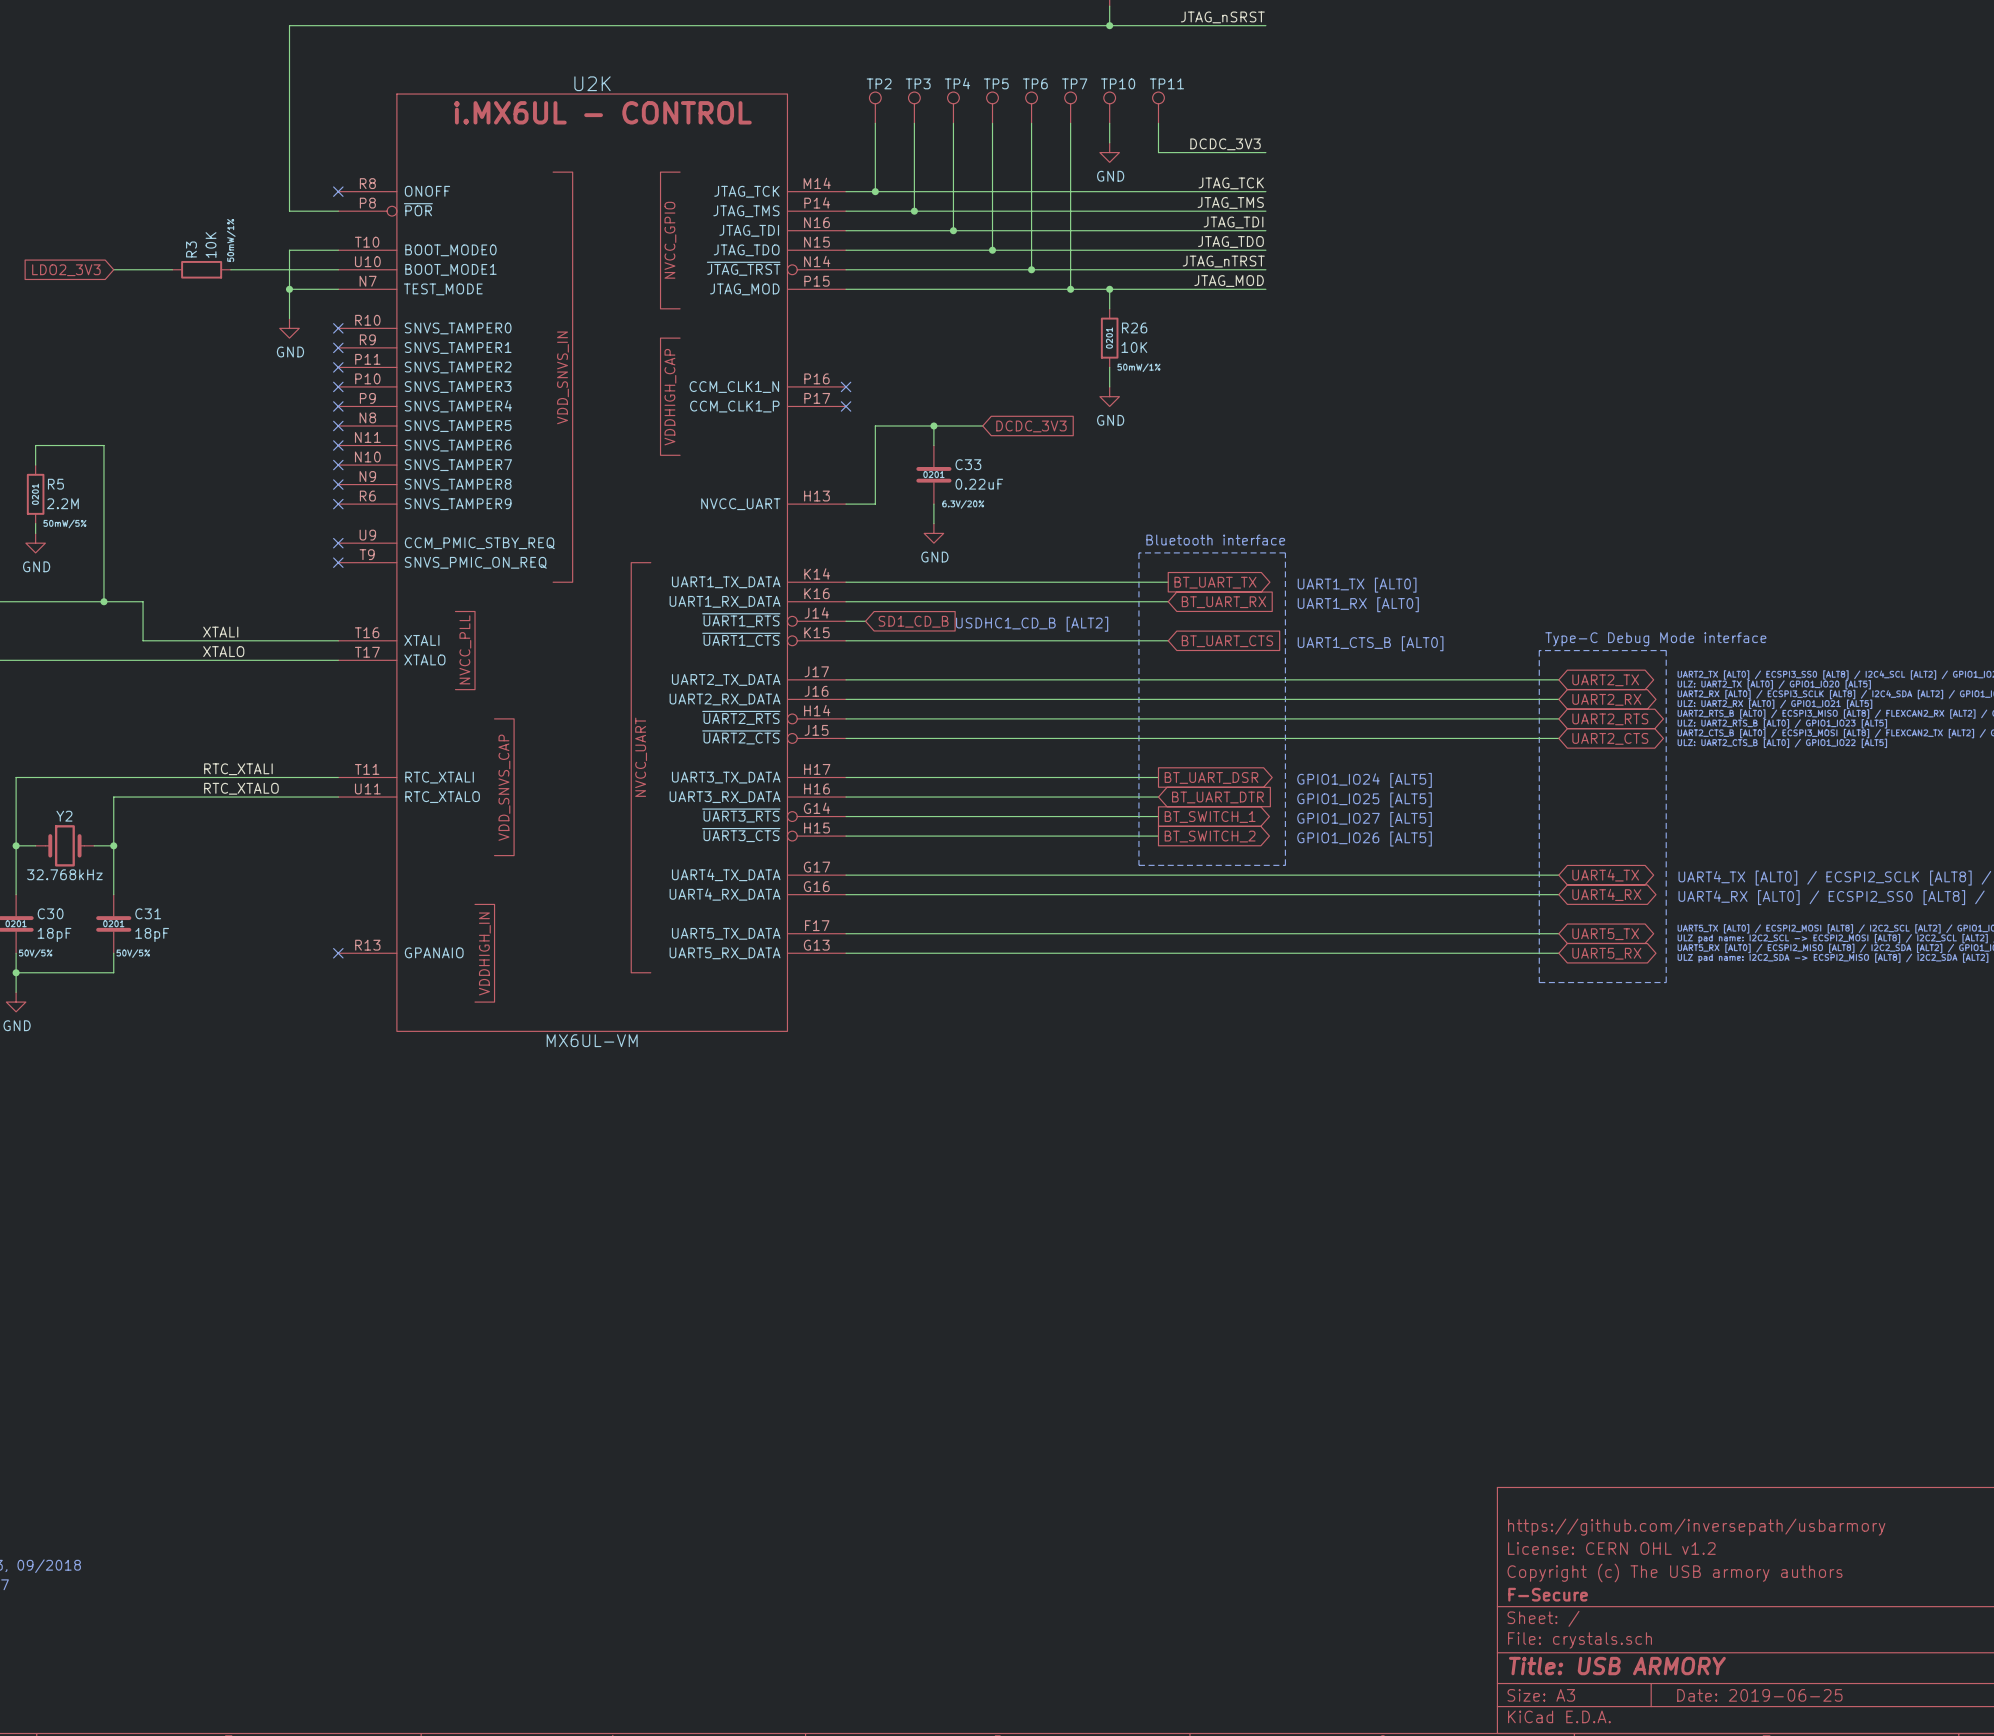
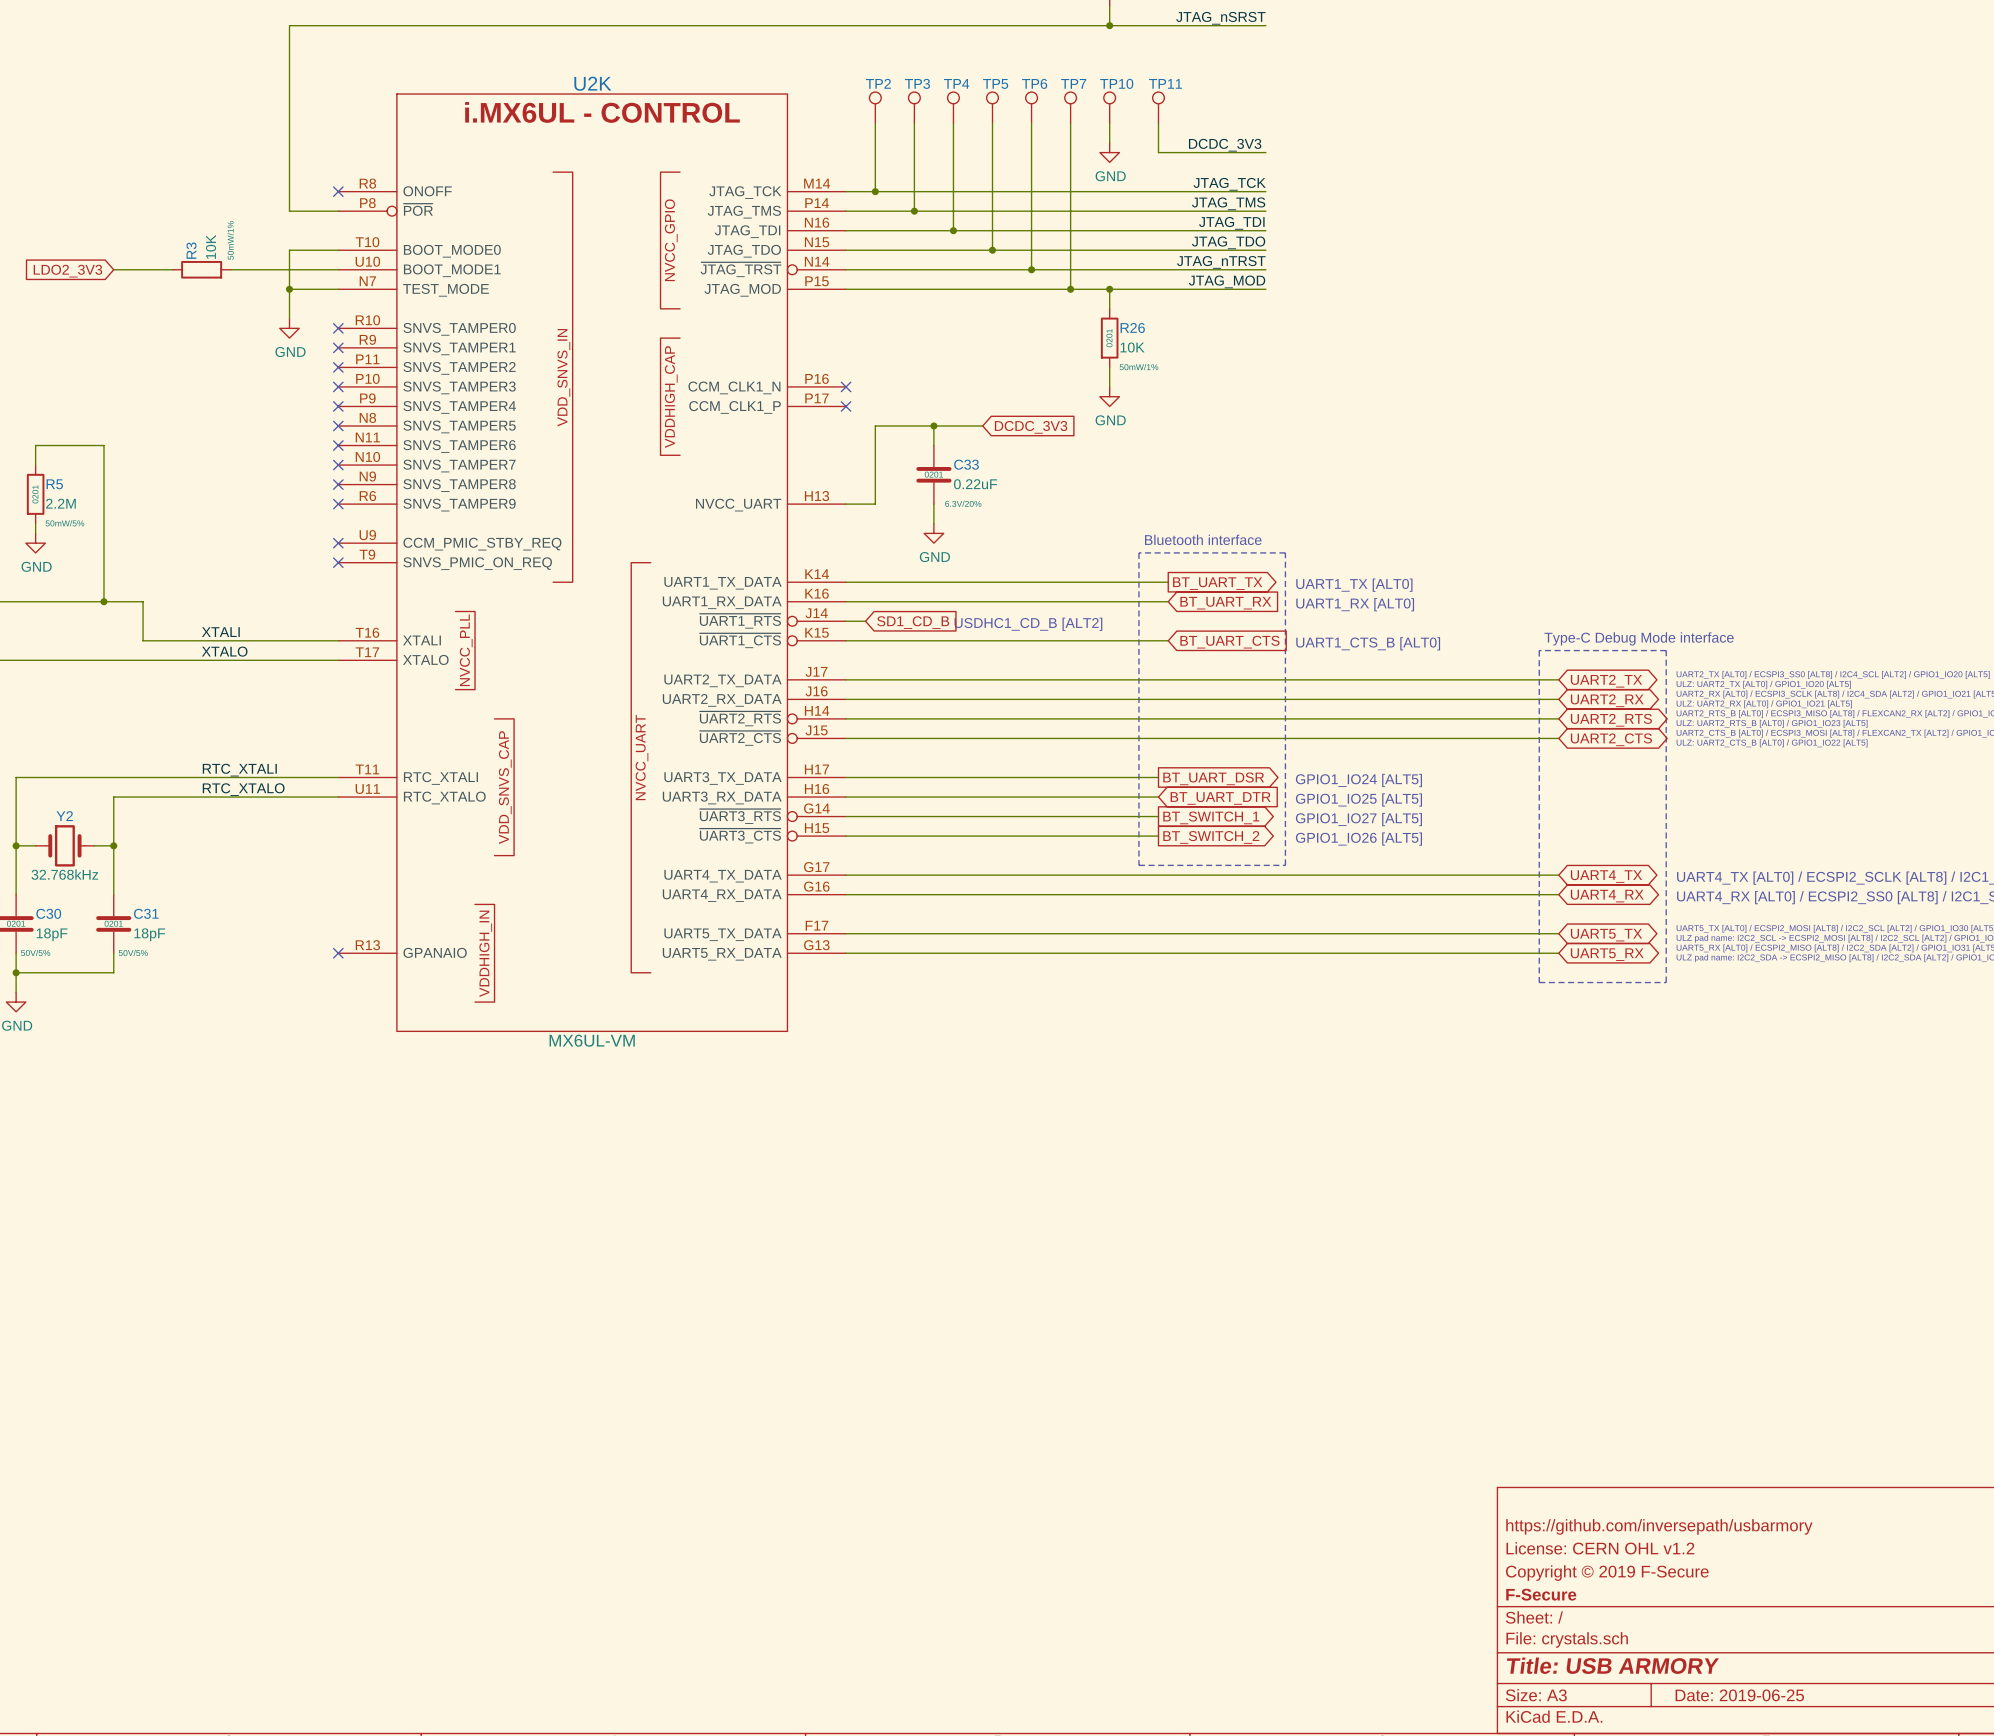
title block: Copyright (c) The USB armory authors (1675, 1572) -> Copyright © 2019 F-Secure (1607, 1573)

